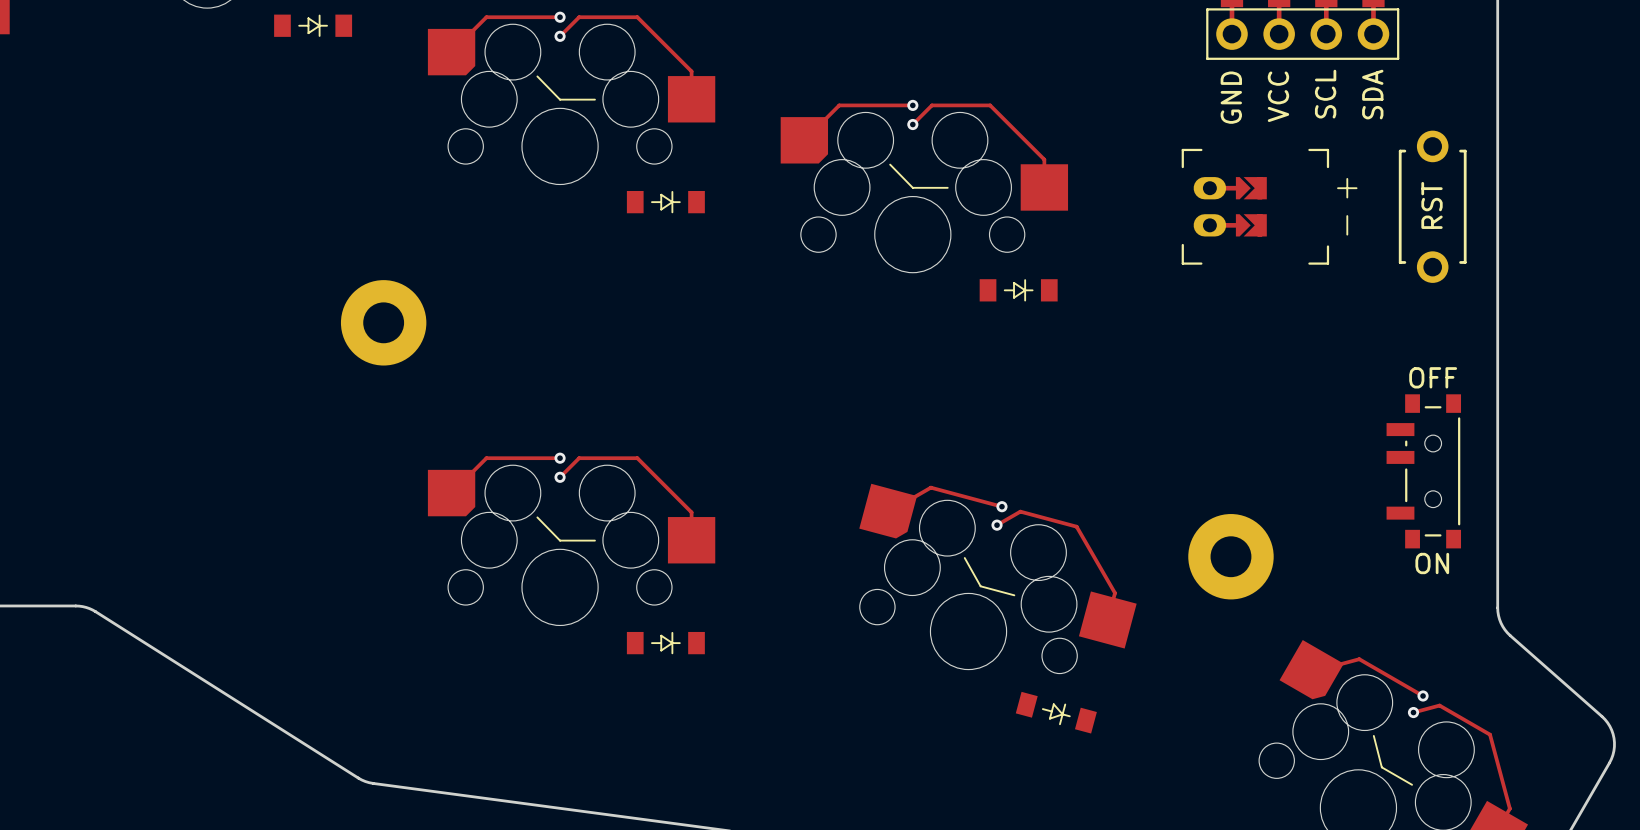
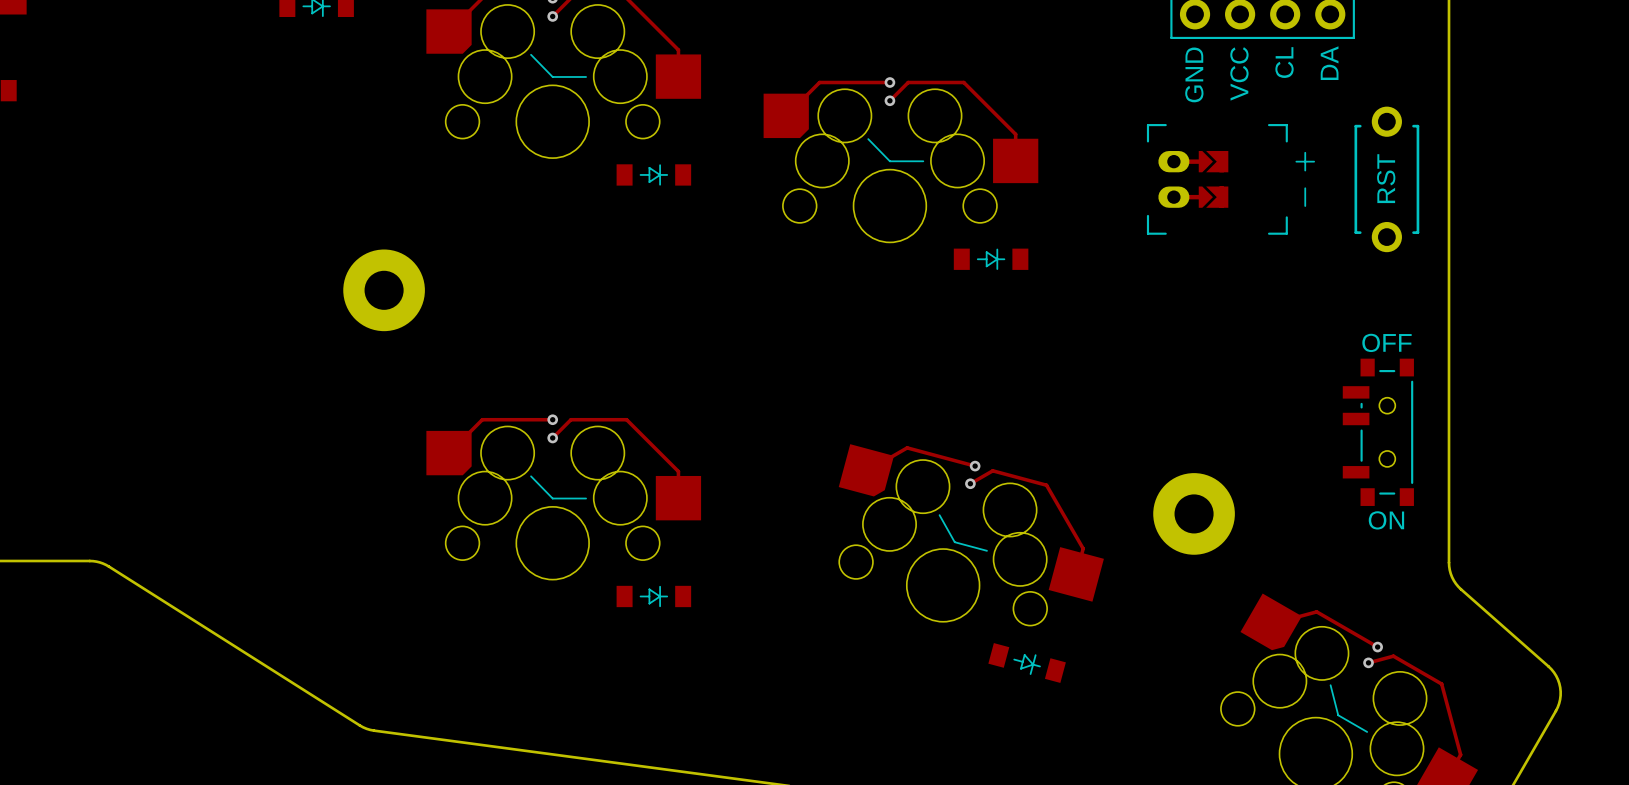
part text: SCL (1325, 94) -> CL (1284, 62)
part text: SDA (1372, 94) -> DA (1329, 63)

